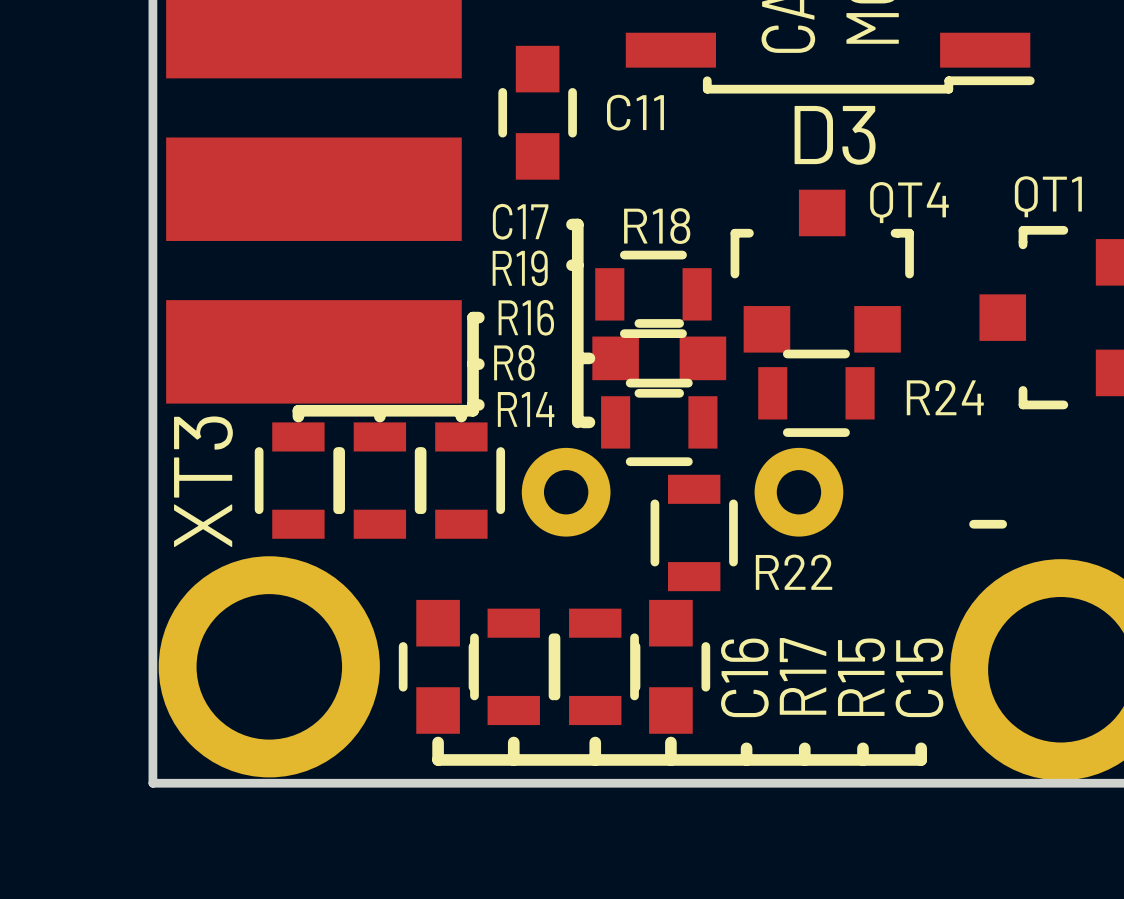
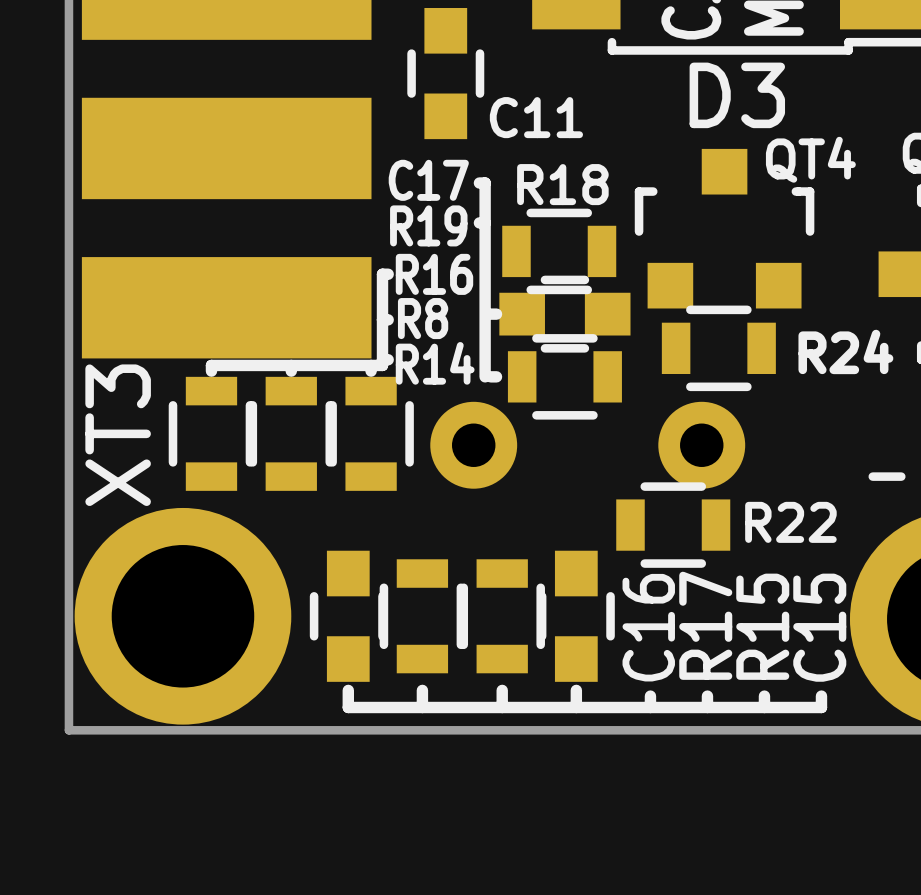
C11 name position: C11 (635, 112) -> C11 (536, 117)
R22 rotation: 0° (694, 532) -> 90° clockwise (673, 525)
R22 position: (694, 532) -> (673, 525)

